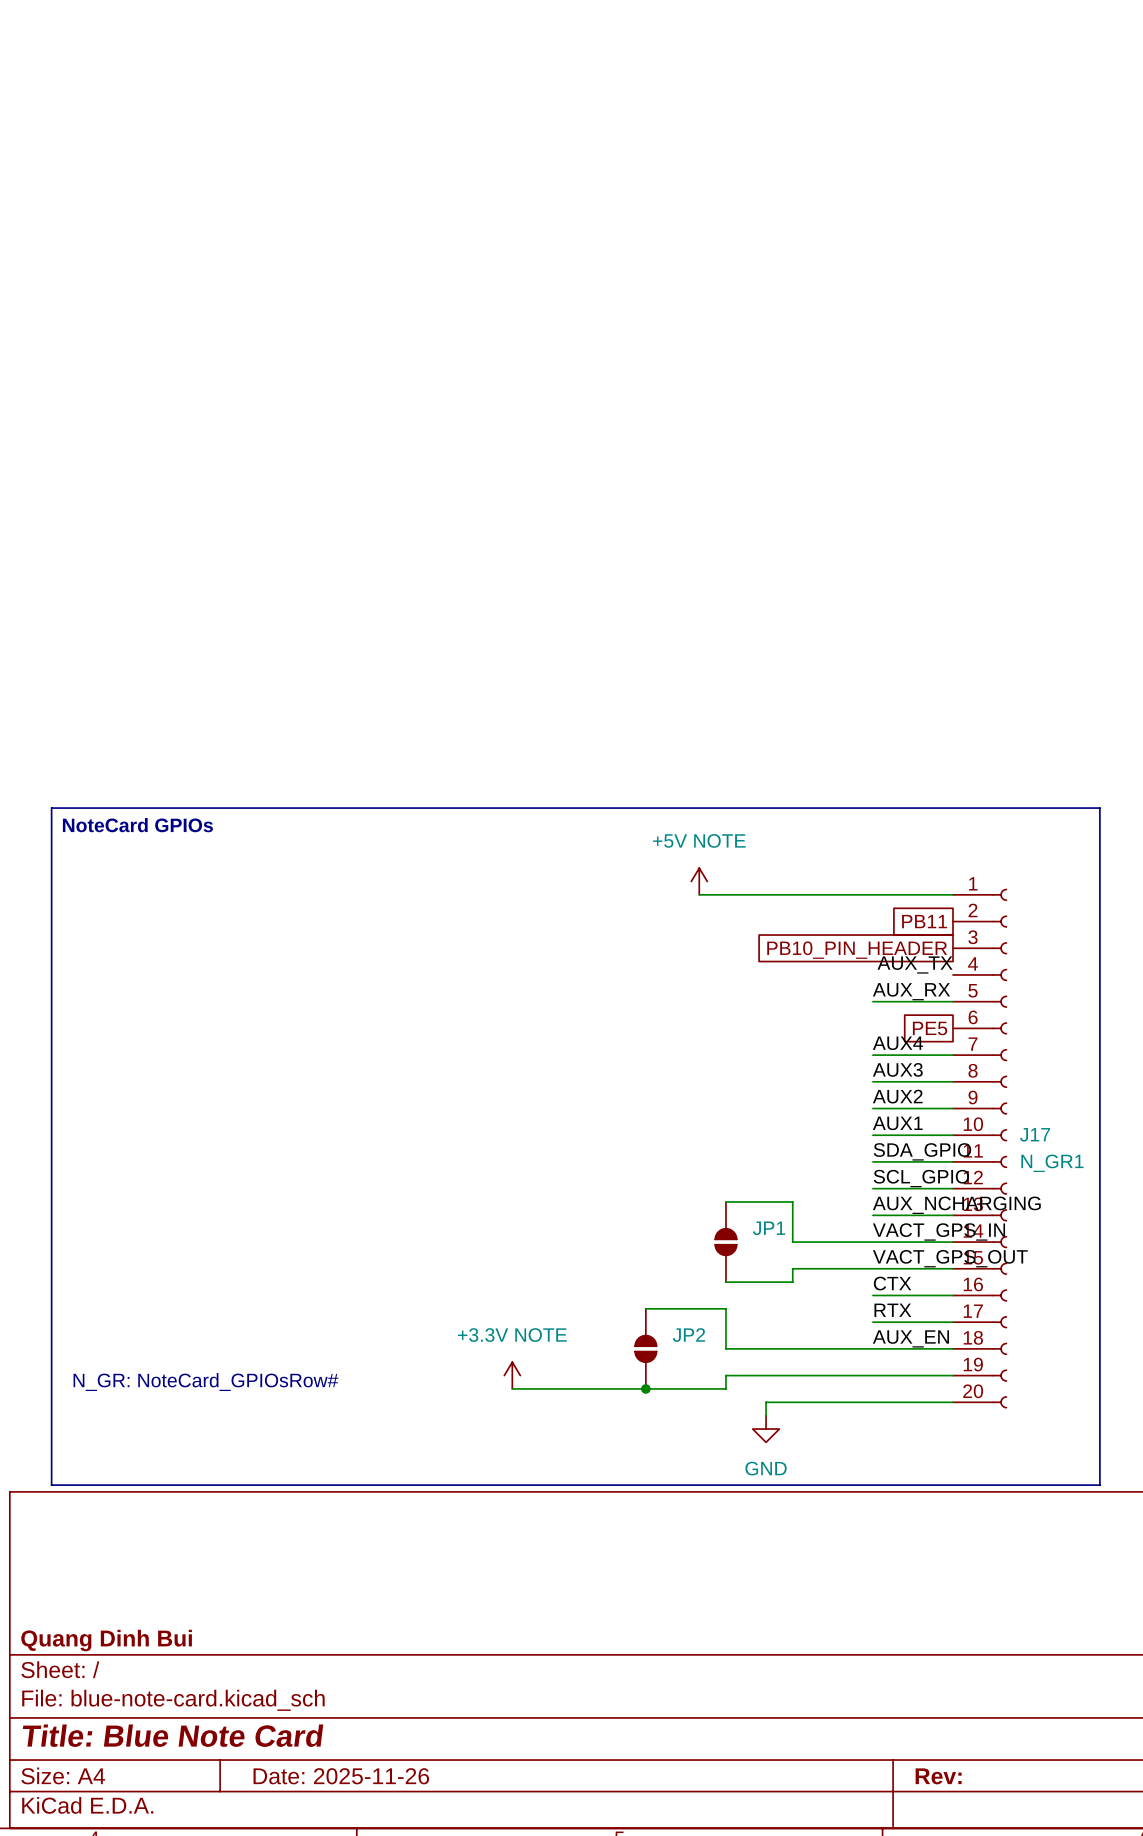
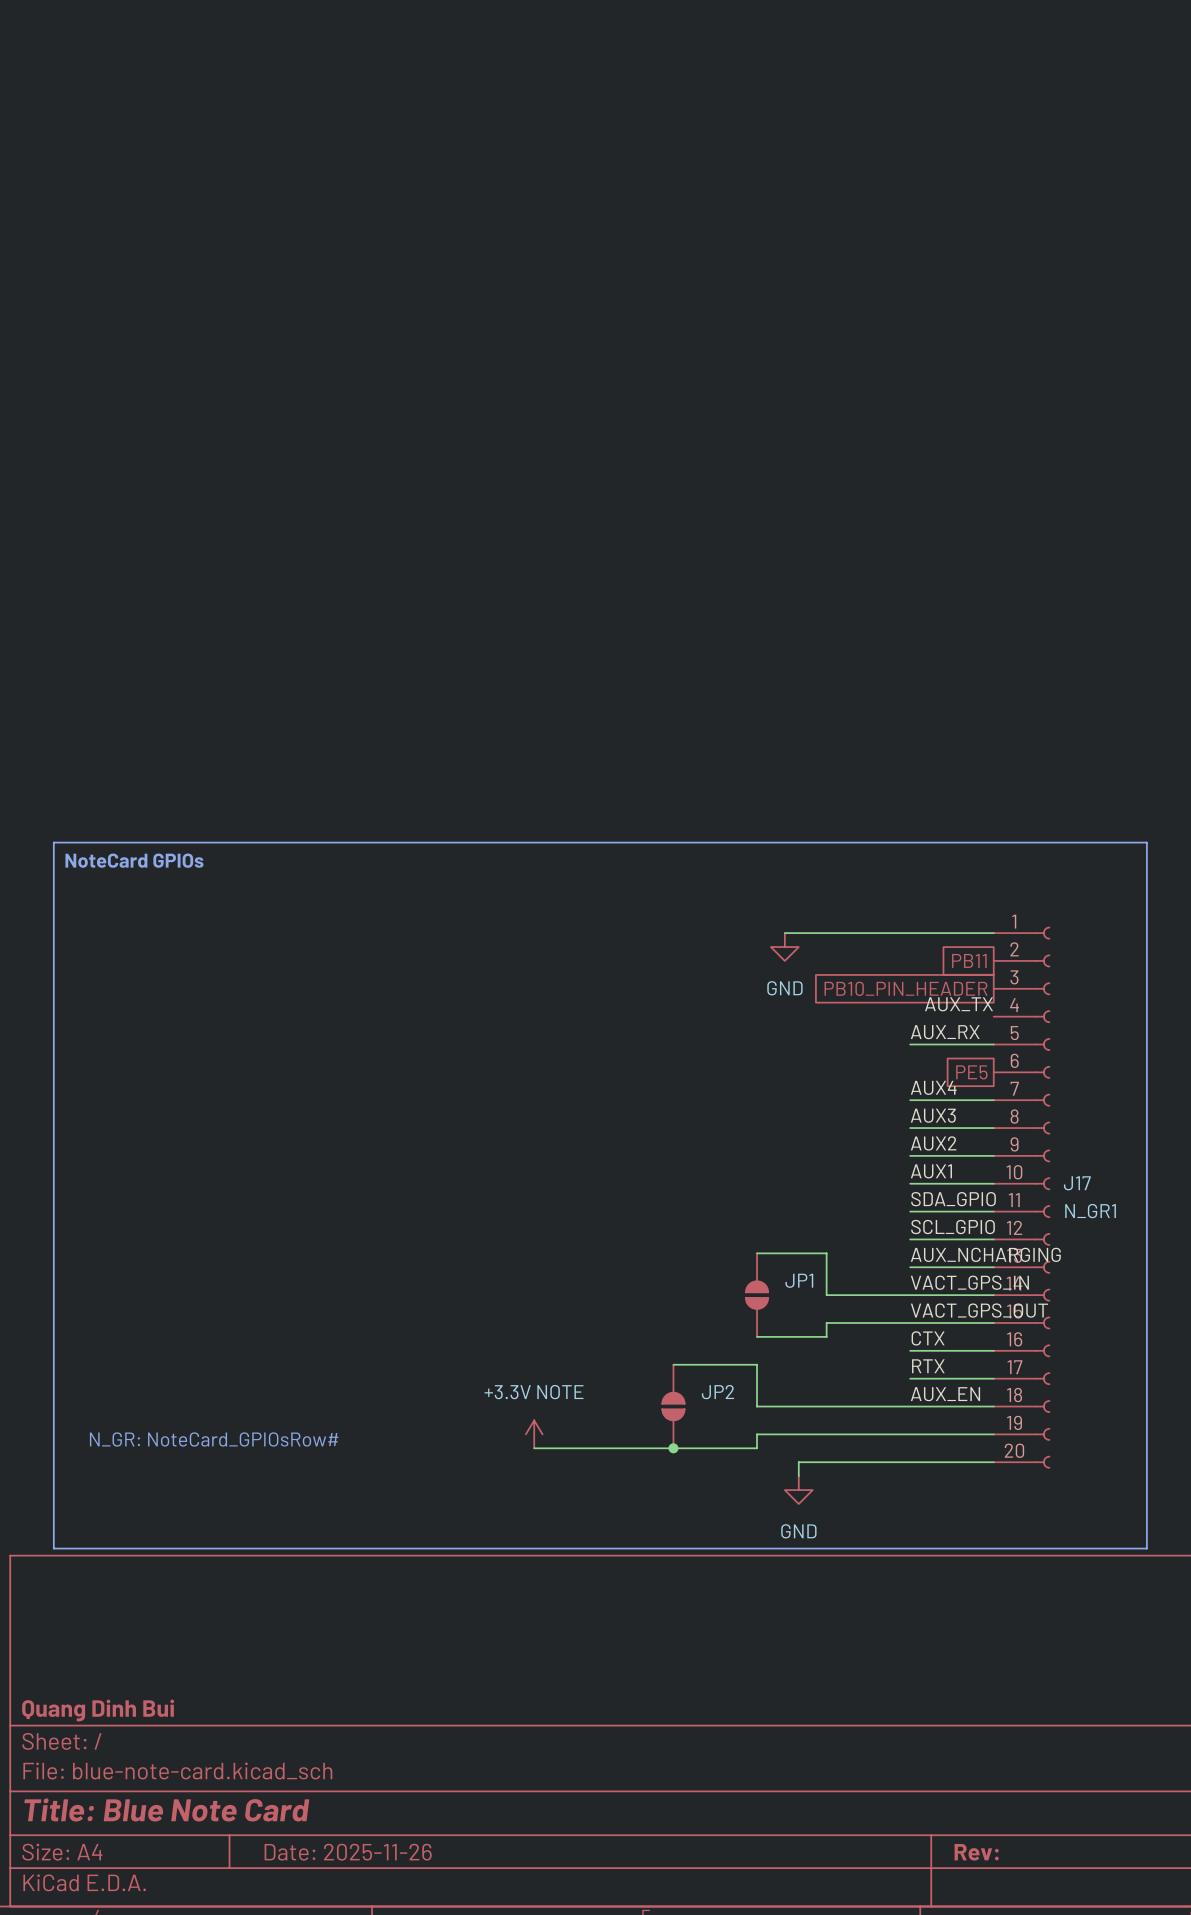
power symbol: +5V NOTE (699, 881) -> none
wire: (699, 894) (752, 894) -> none
power symbol: none -> GND (784, 947)

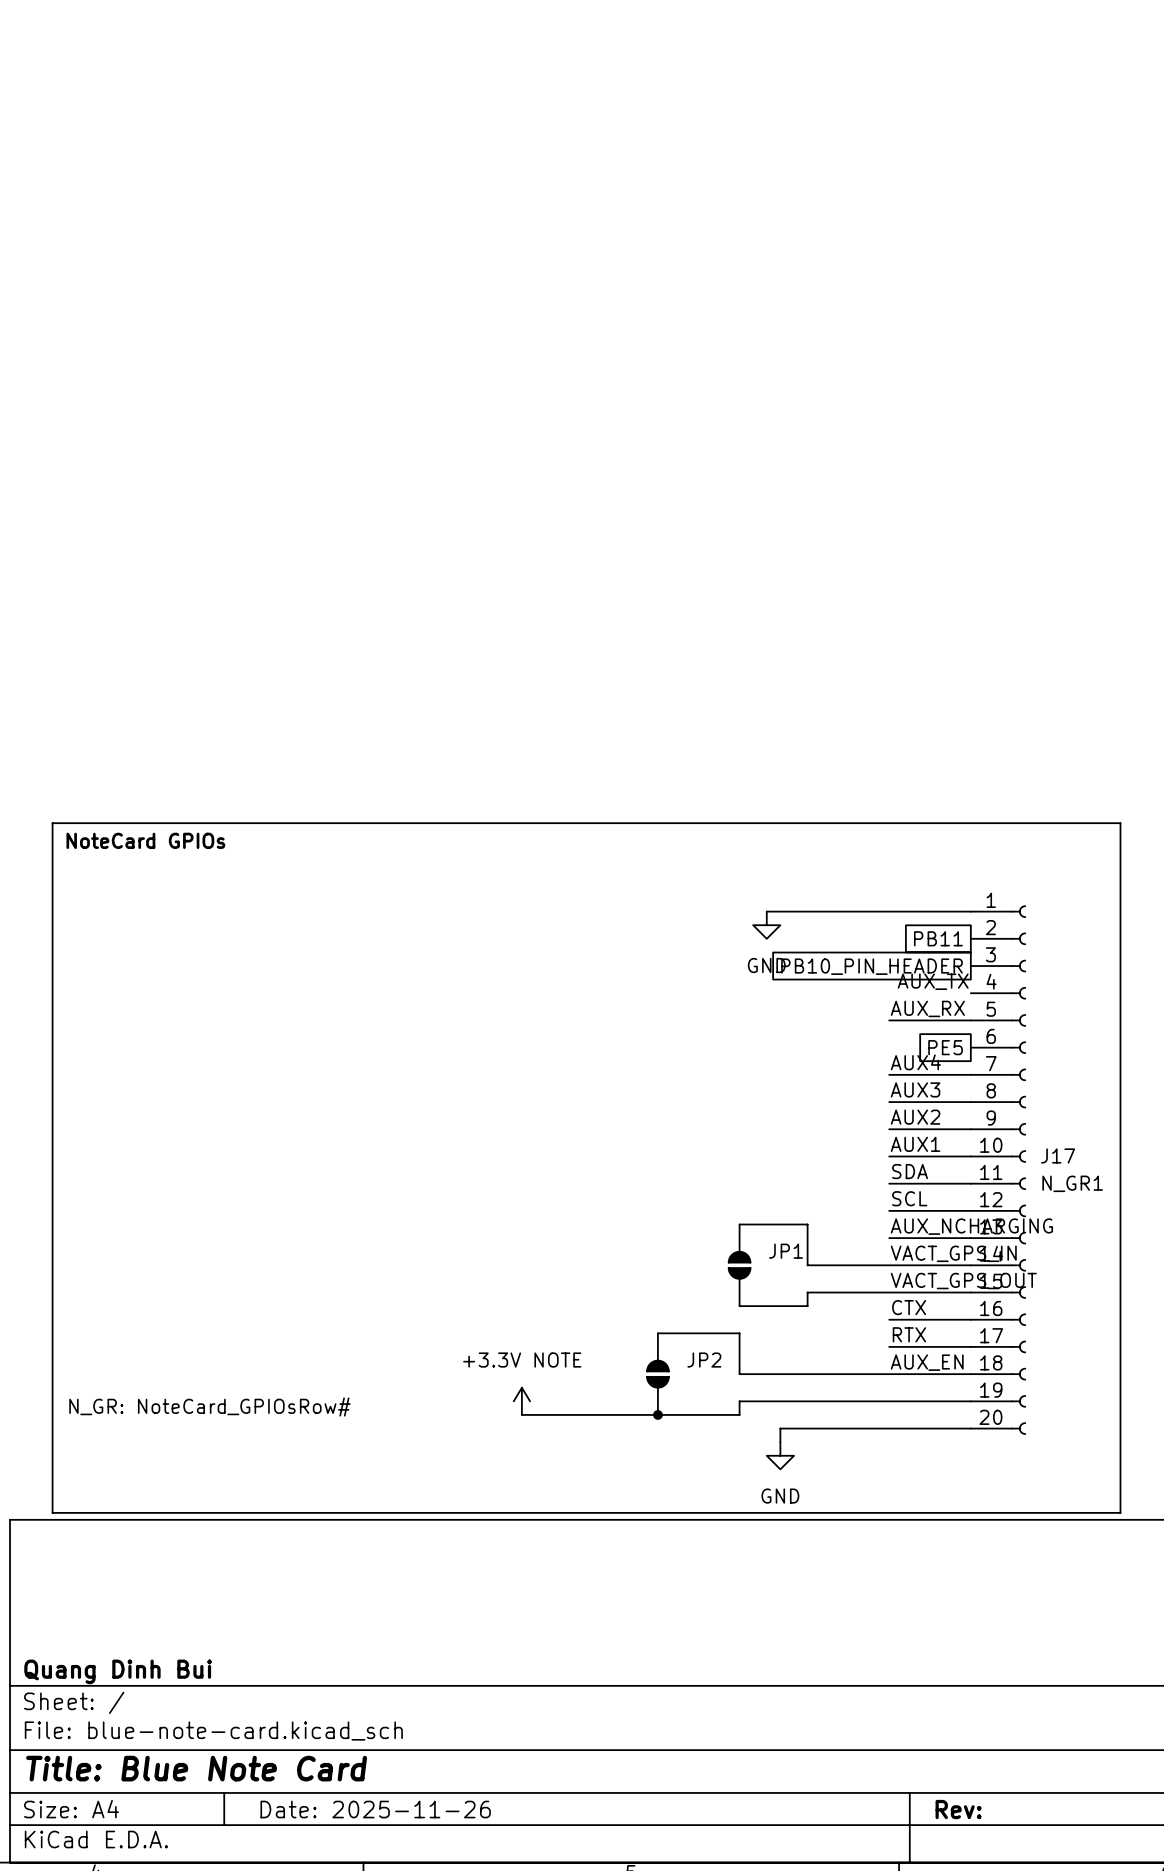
label: SDA_GPIO (953, 1199) -> SDA (910, 1171)
label: SCL_GPIO (953, 1227) -> SCL (909, 1198)

